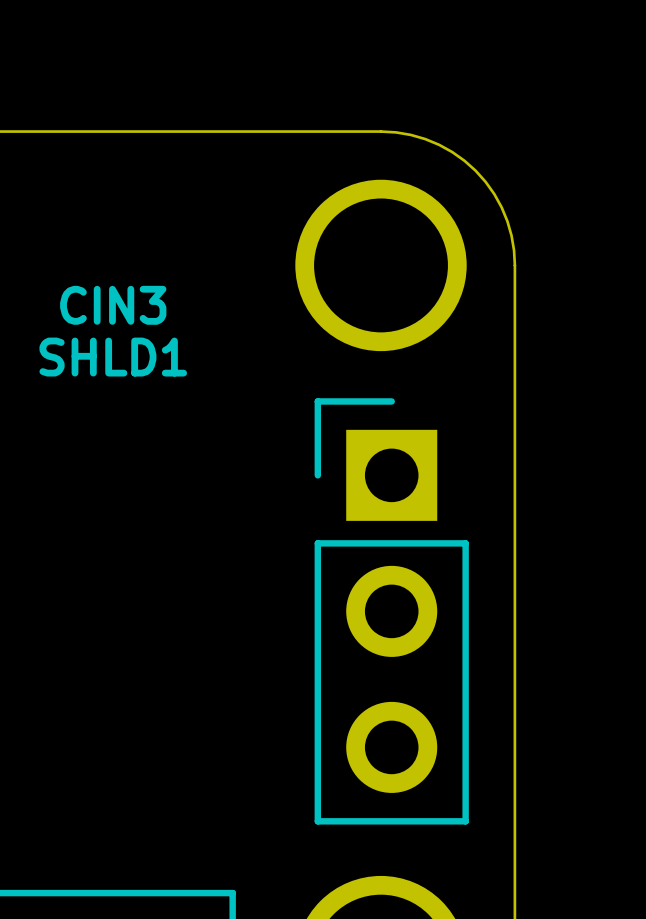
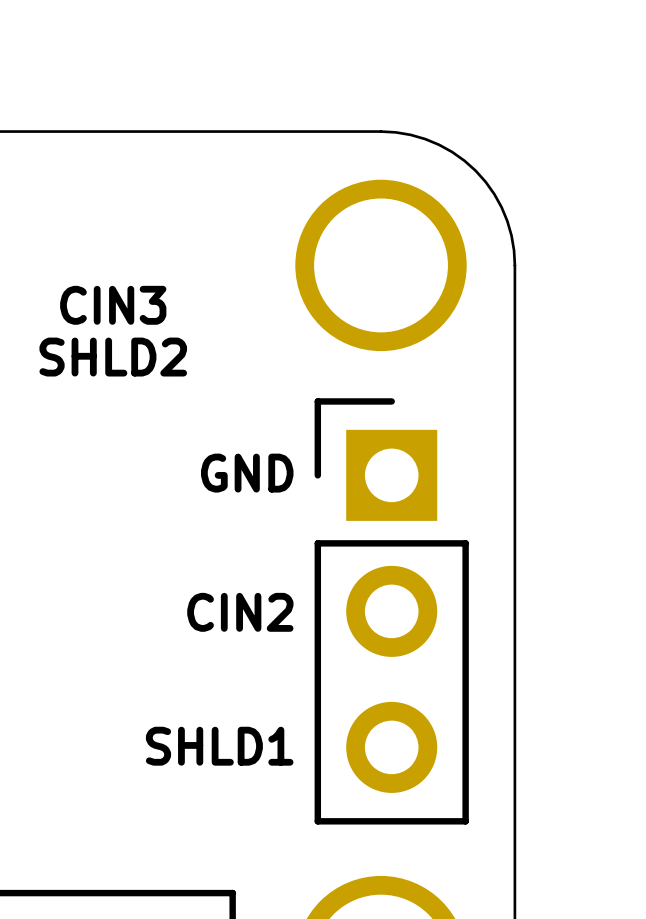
text: SHLD1 (113, 357) -> SHLD2 (113, 357)
text: none -> GND (247, 473)
text: none -> CIN2 (240, 612)
text: none -> SHLD1 (219, 746)

